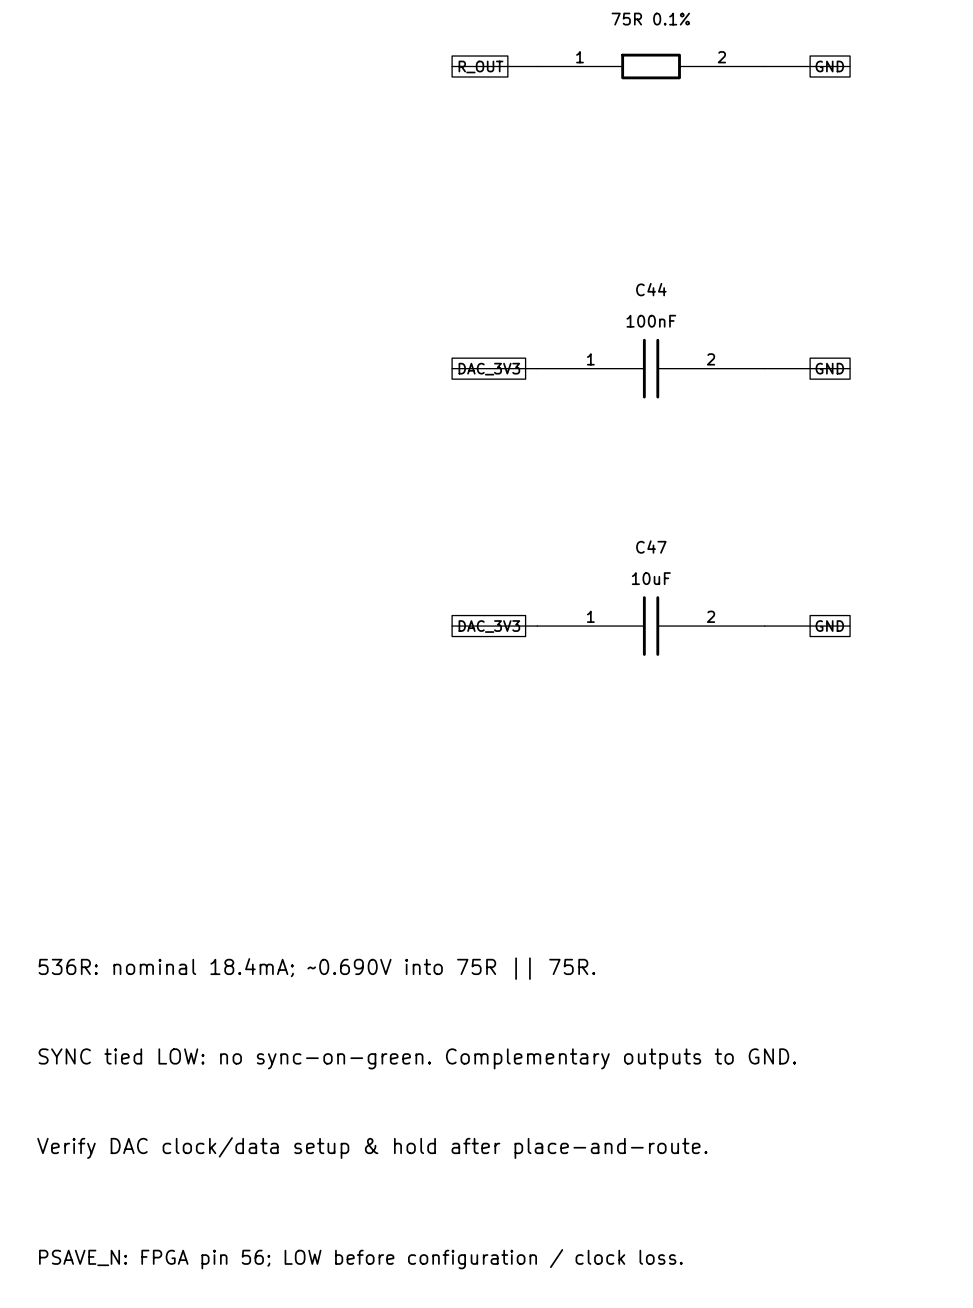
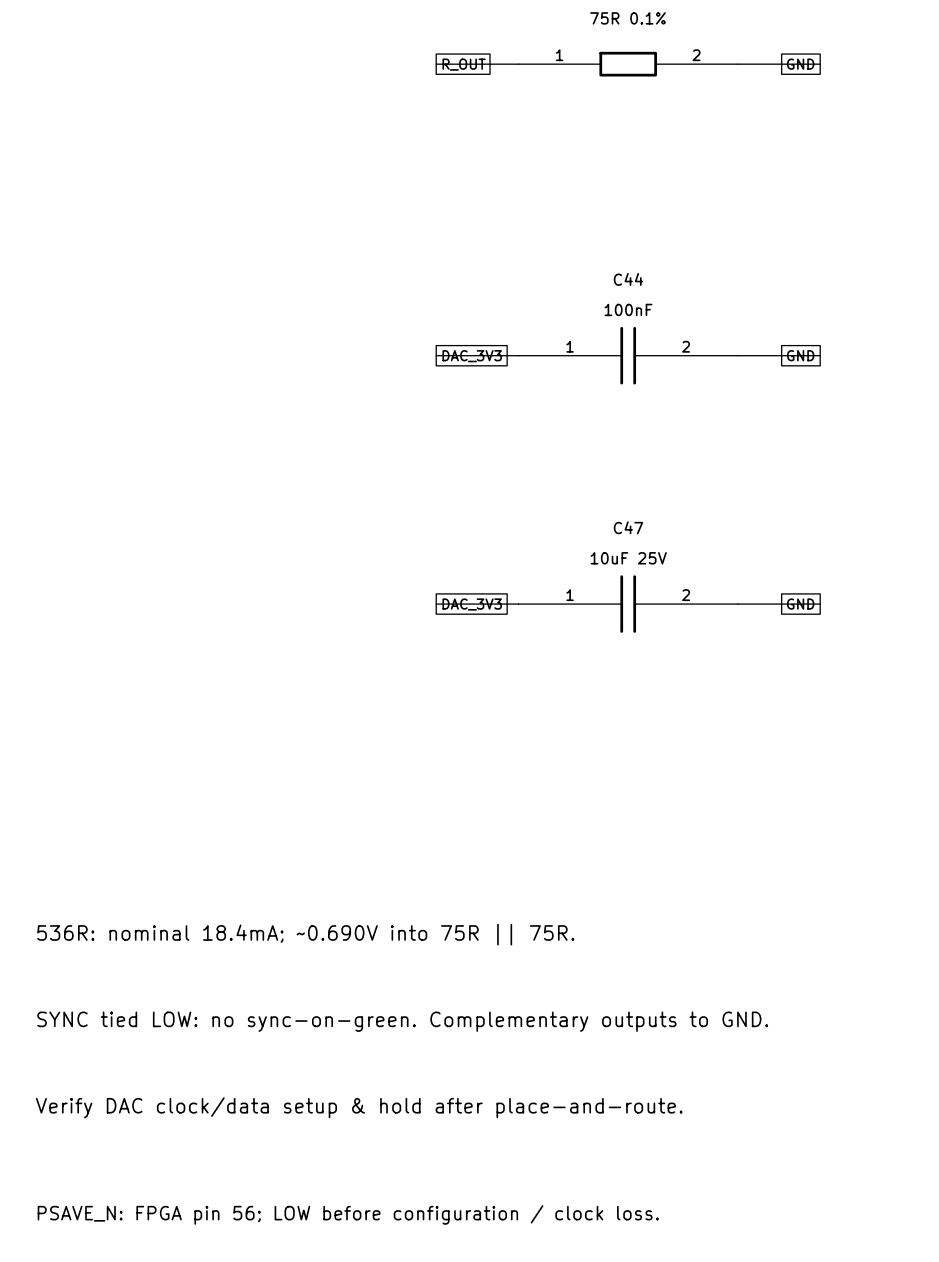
C47 value: 10uF (651, 578) -> 10uF 25V (628, 558)

